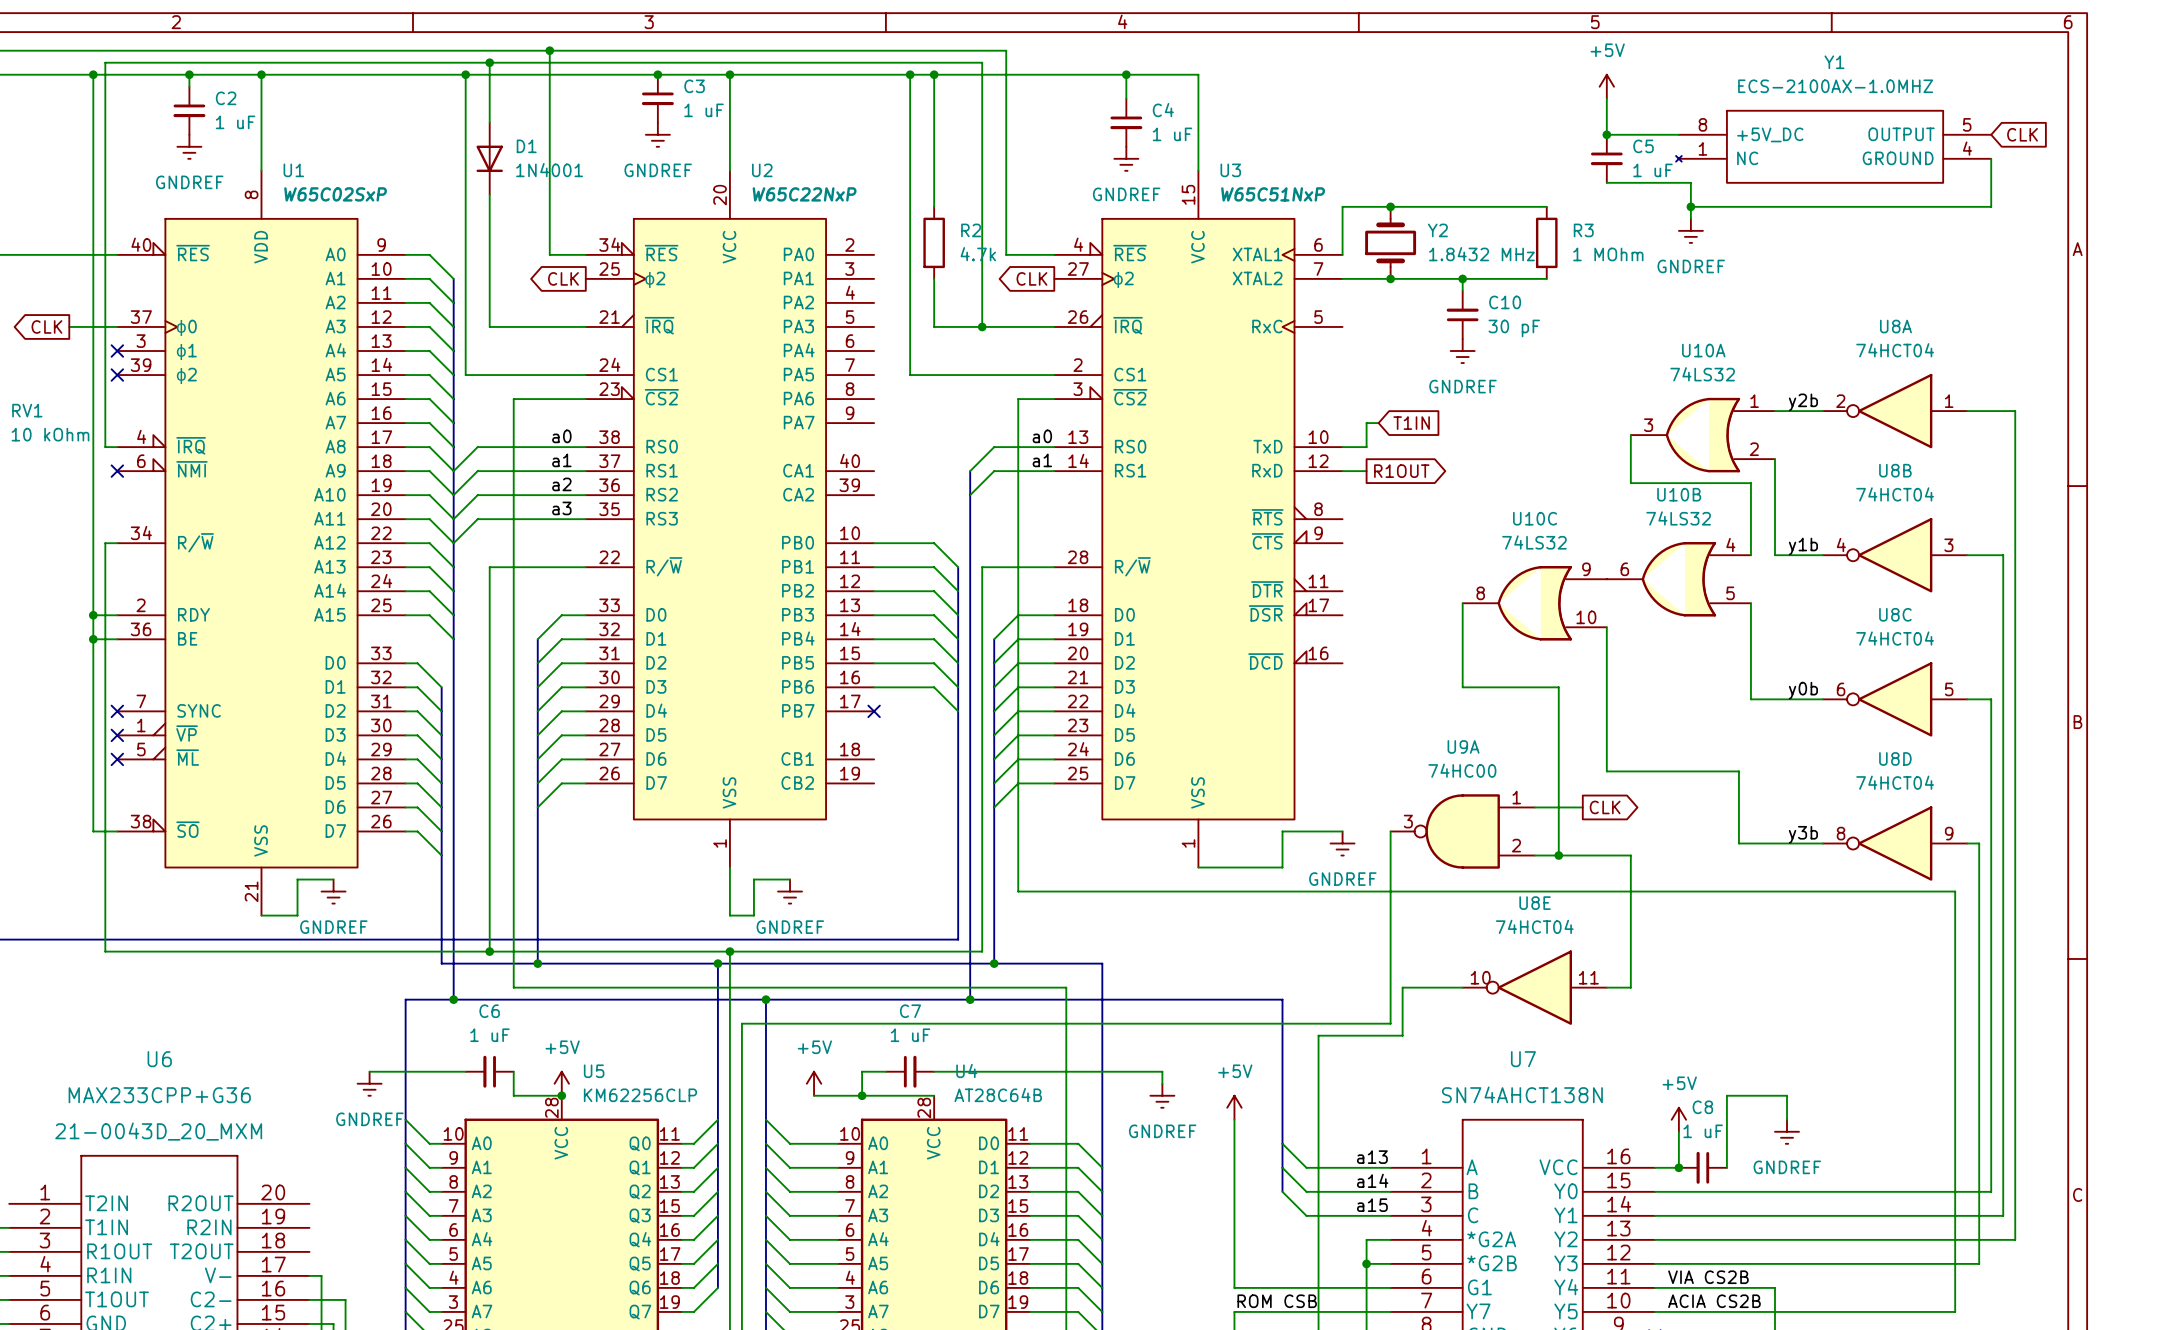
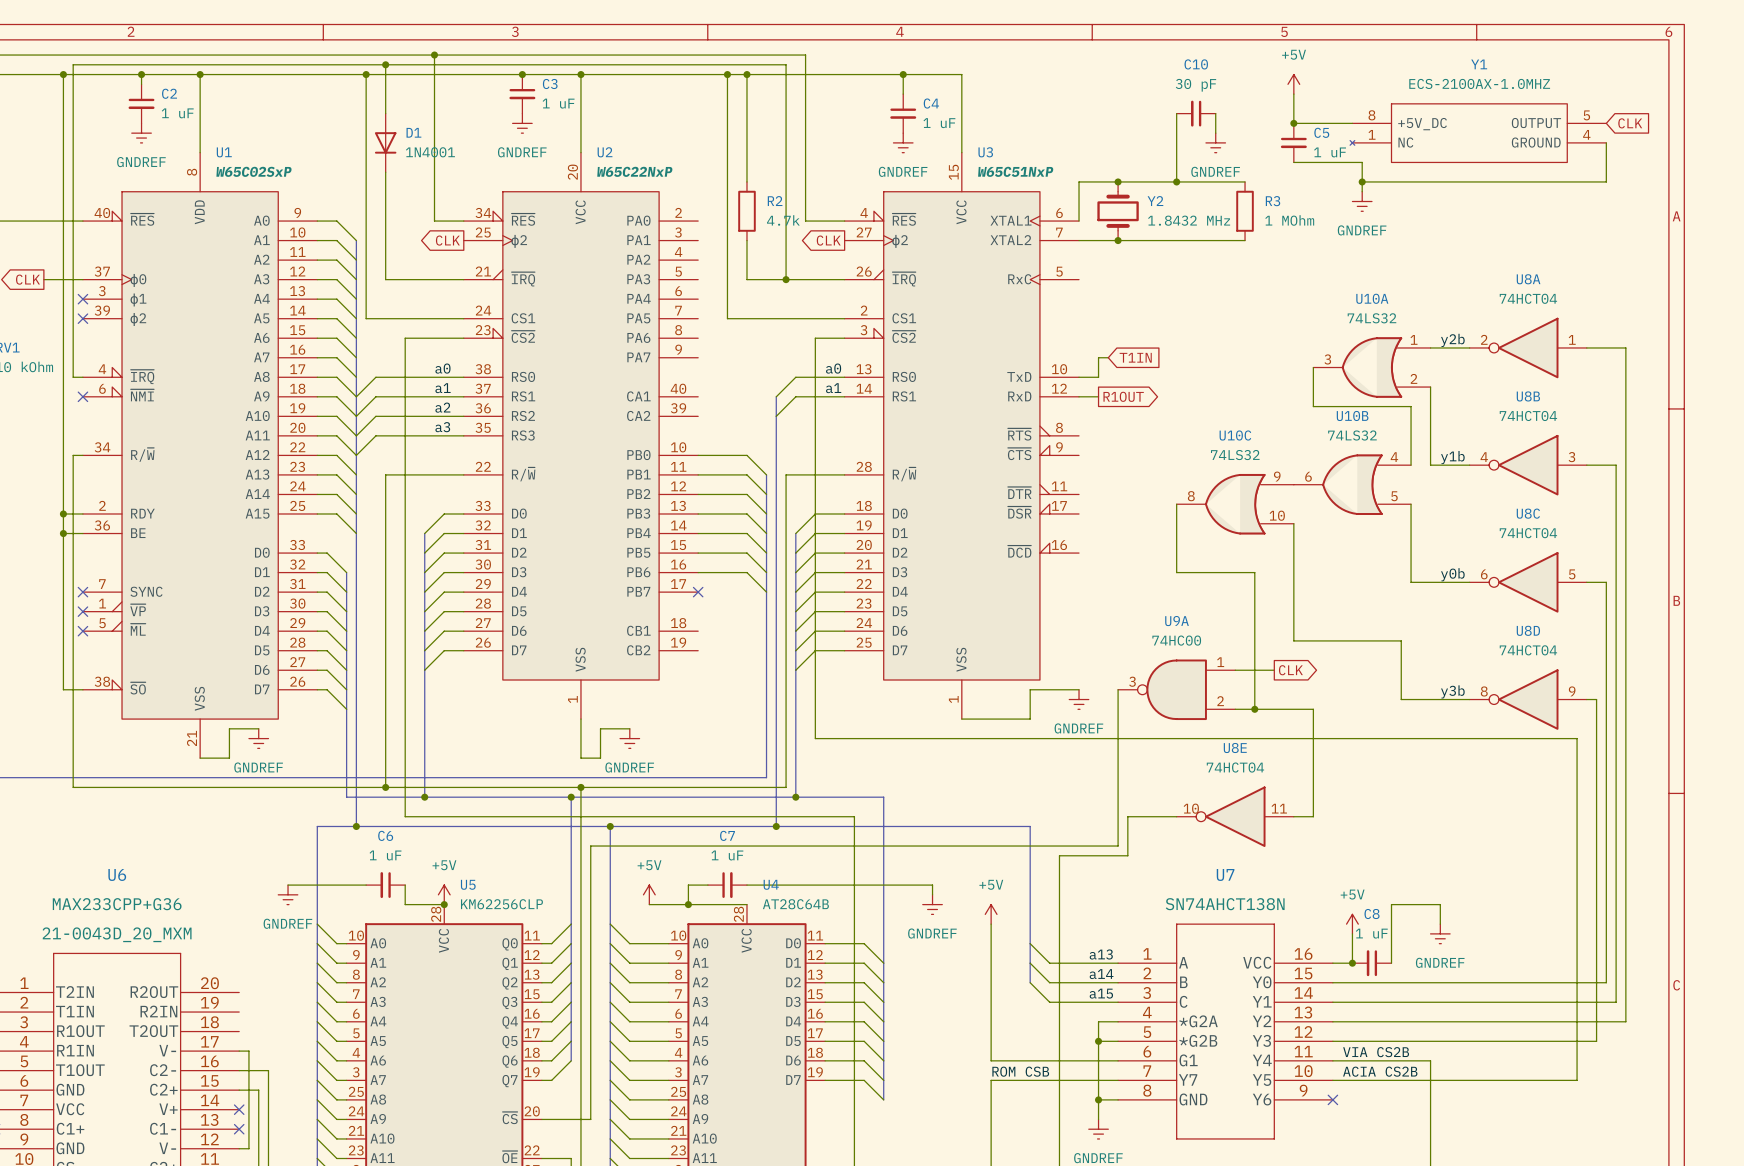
wire: none -> (1176, 113) (1176, 181)
wire: none -> (1215, 113) (1215, 133)
junction: none -> (1176, 181)
wire: (1462, 278) (1462, 290) -> none
junction: (1462, 278) -> none
C10 name position: C10 (1505, 302) -> C10 (1196, 64)
C10 rotation: 0° (1462, 314) -> 90° counterclockwise (1196, 113)
C10 position: (1462, 314) -> (1196, 113)
C10 value position: 30 pF (1514, 328) -> 30 pF (1195, 85)
power symbol position: GNDREF (1462, 351) -> GNDREF (1215, 142)

